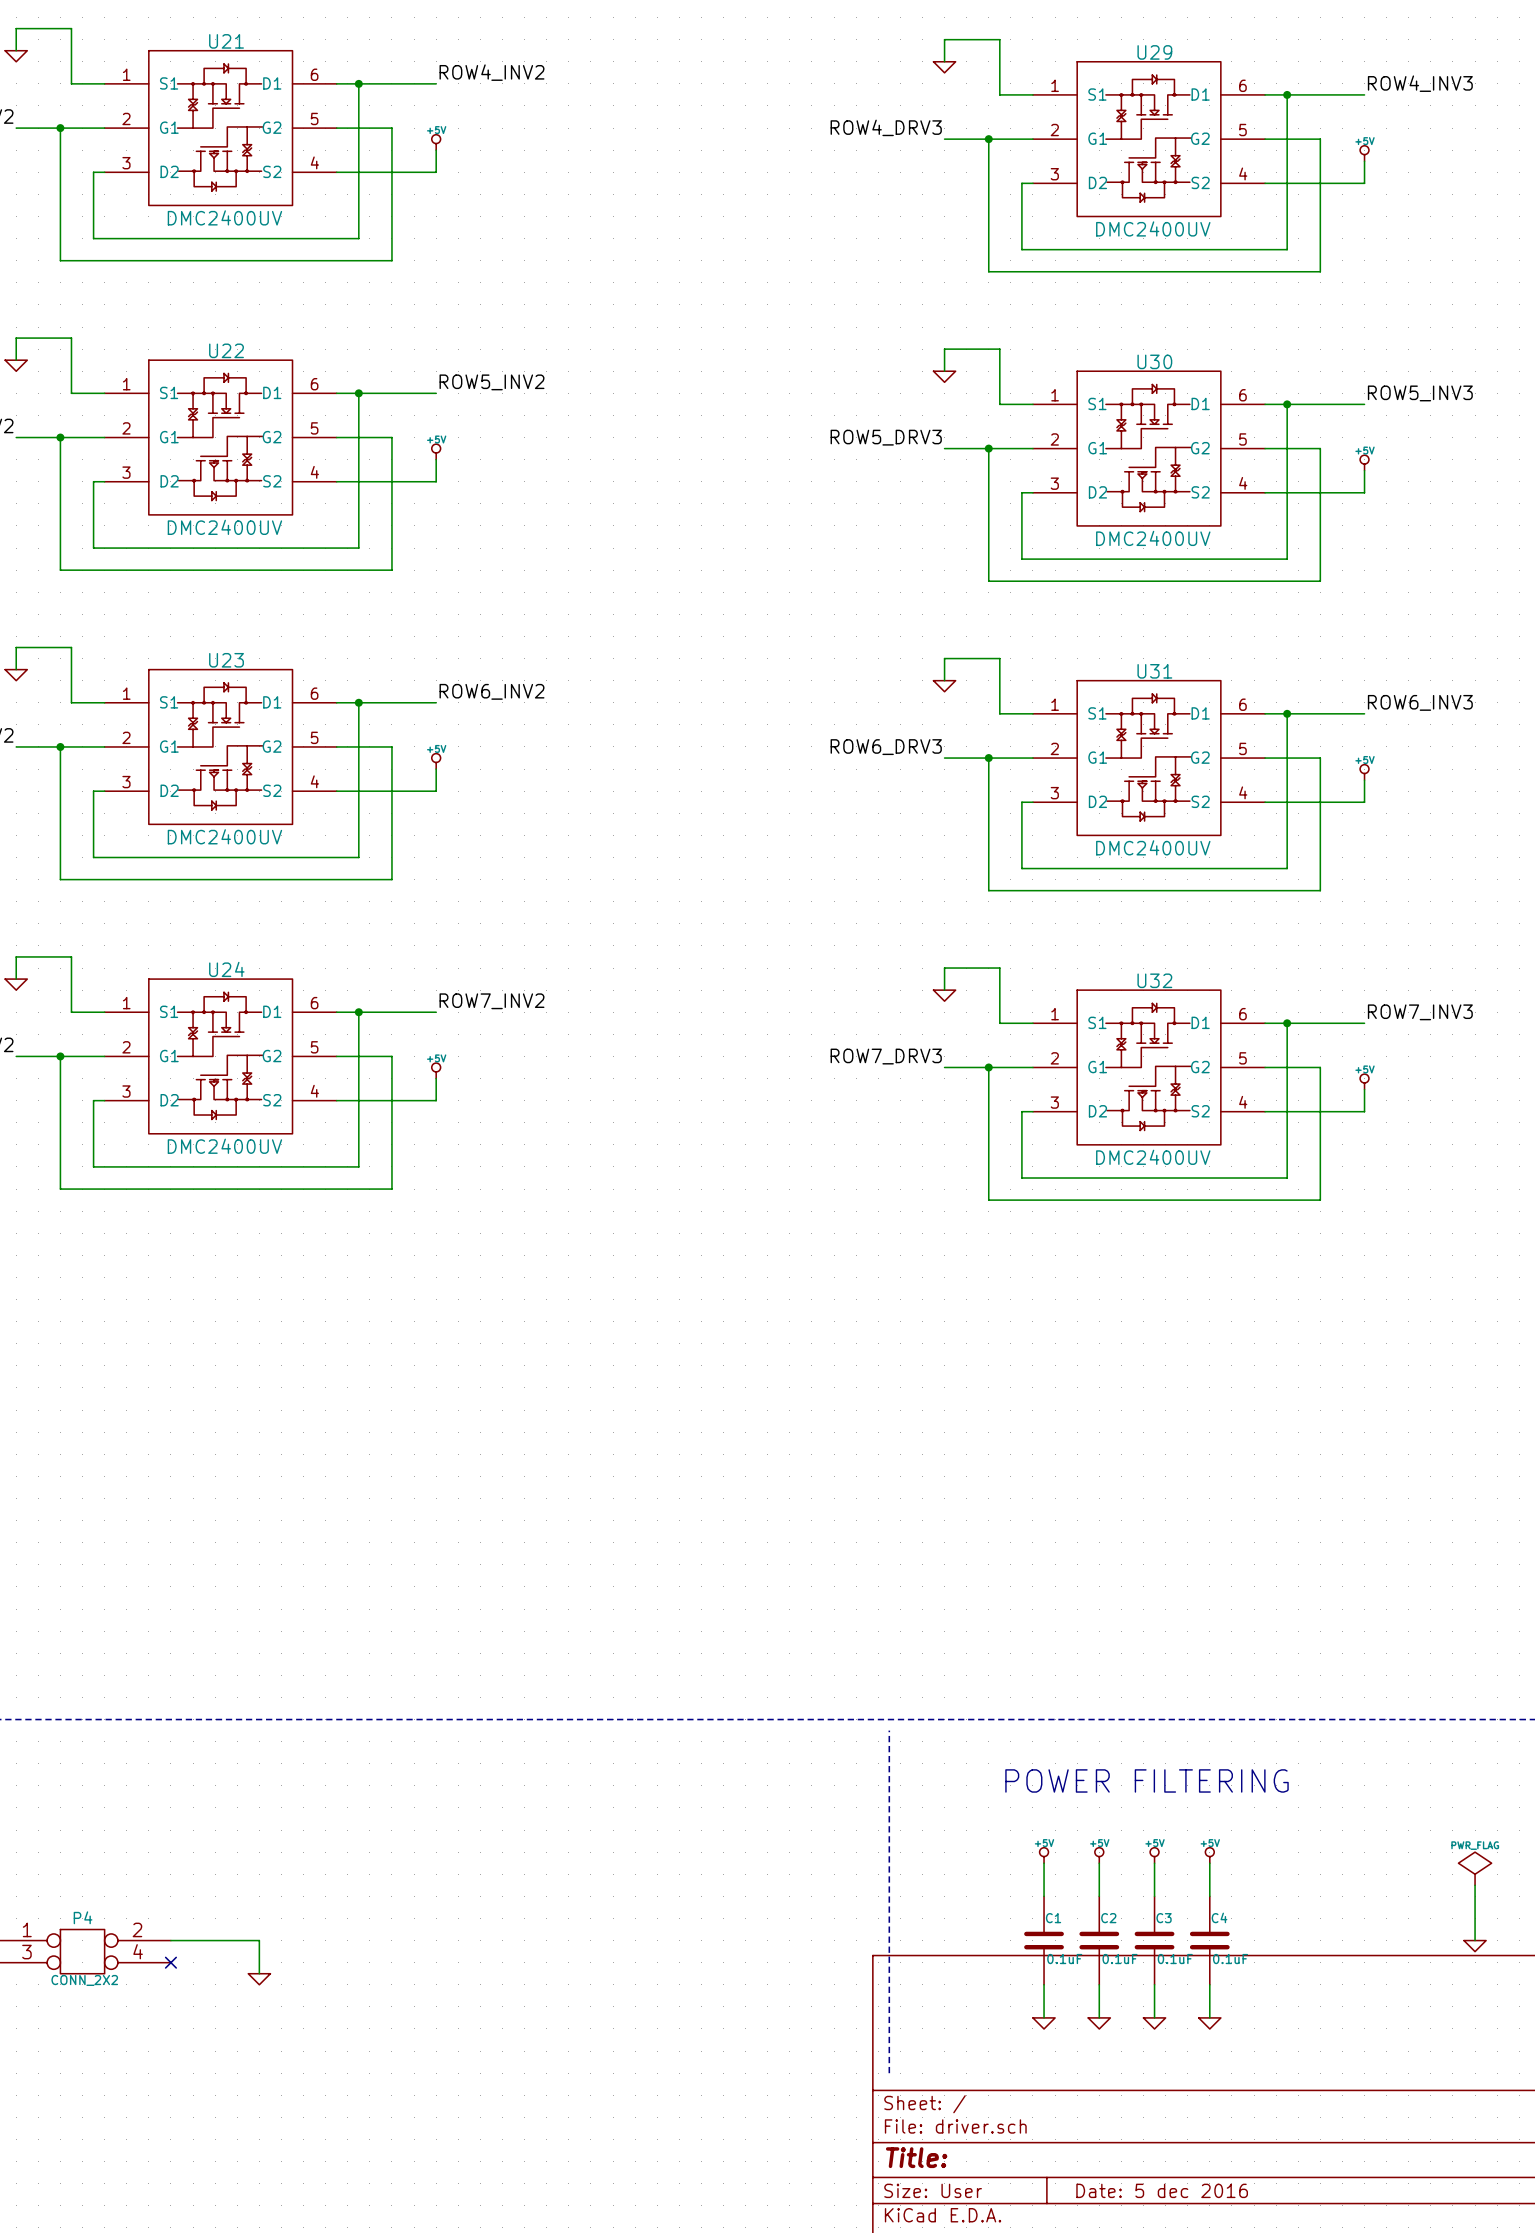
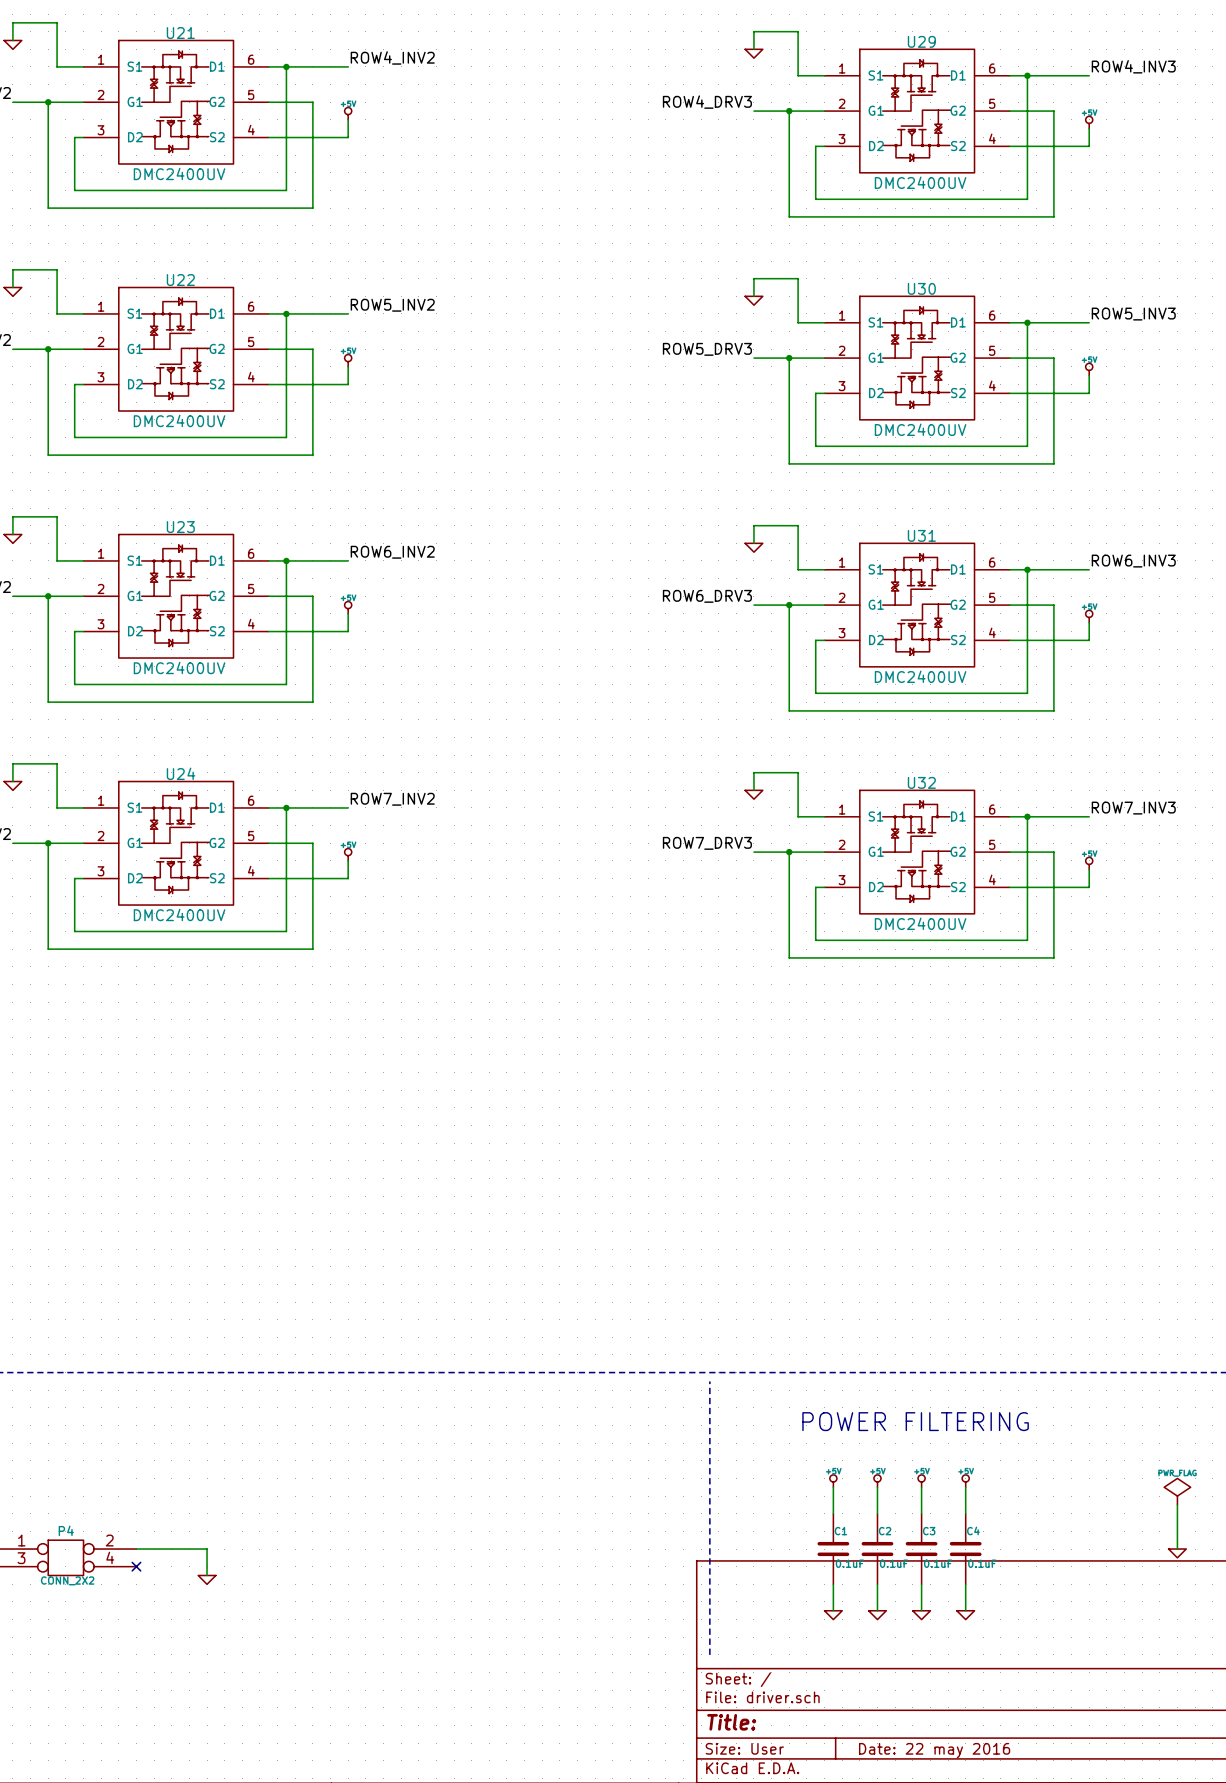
title block: Date: 5 dec 2016 (1162, 2190) -> Date: 22 may 2016 (934, 1750)

